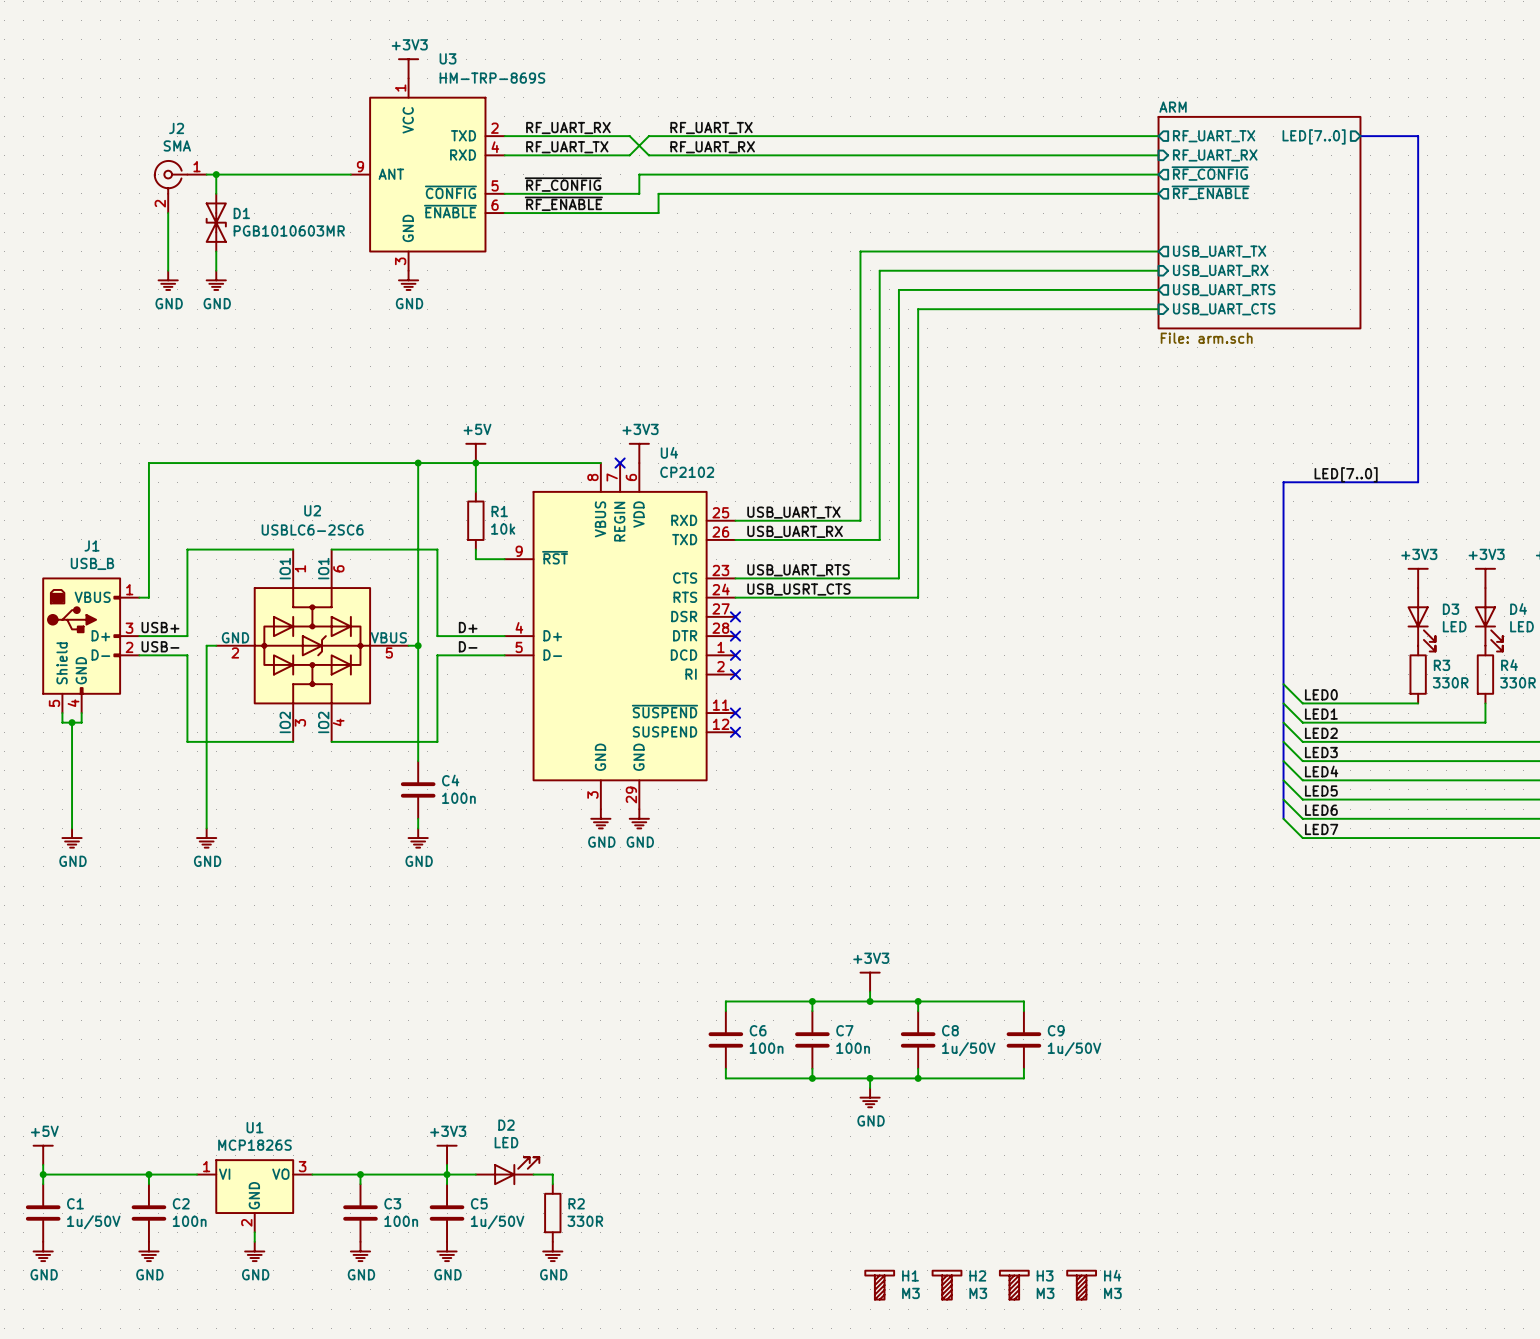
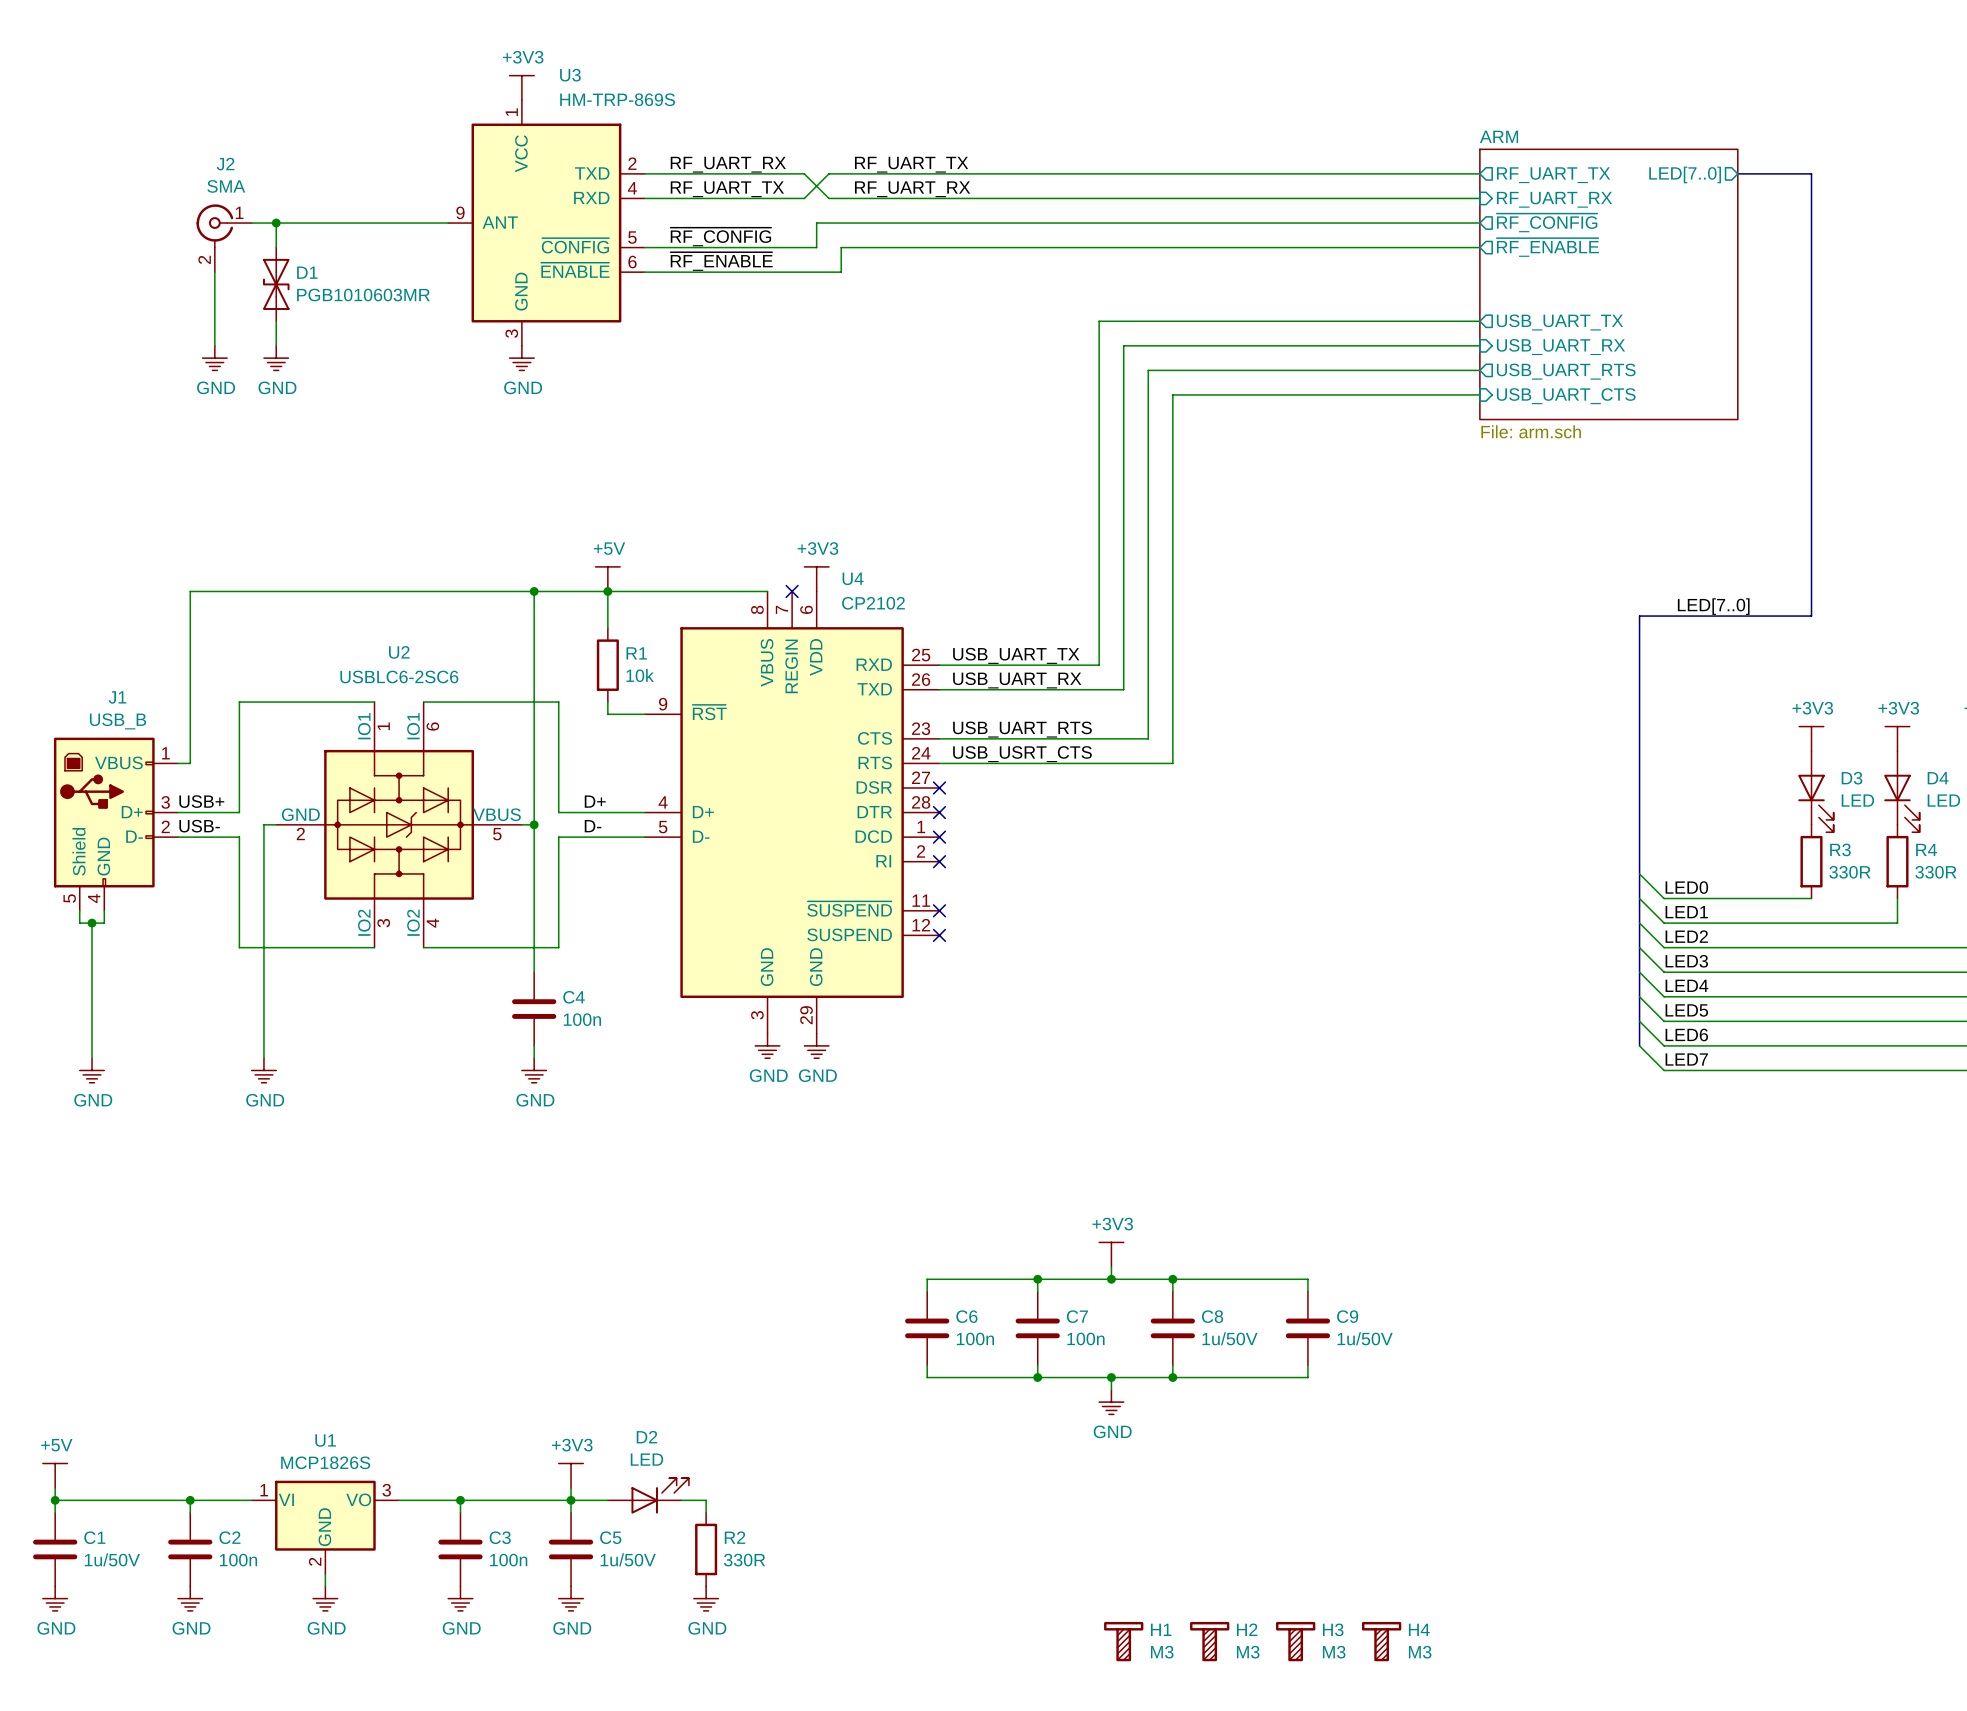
J2 symbol: [153, 159, 207, 214] -> [196, 204, 252, 273]

